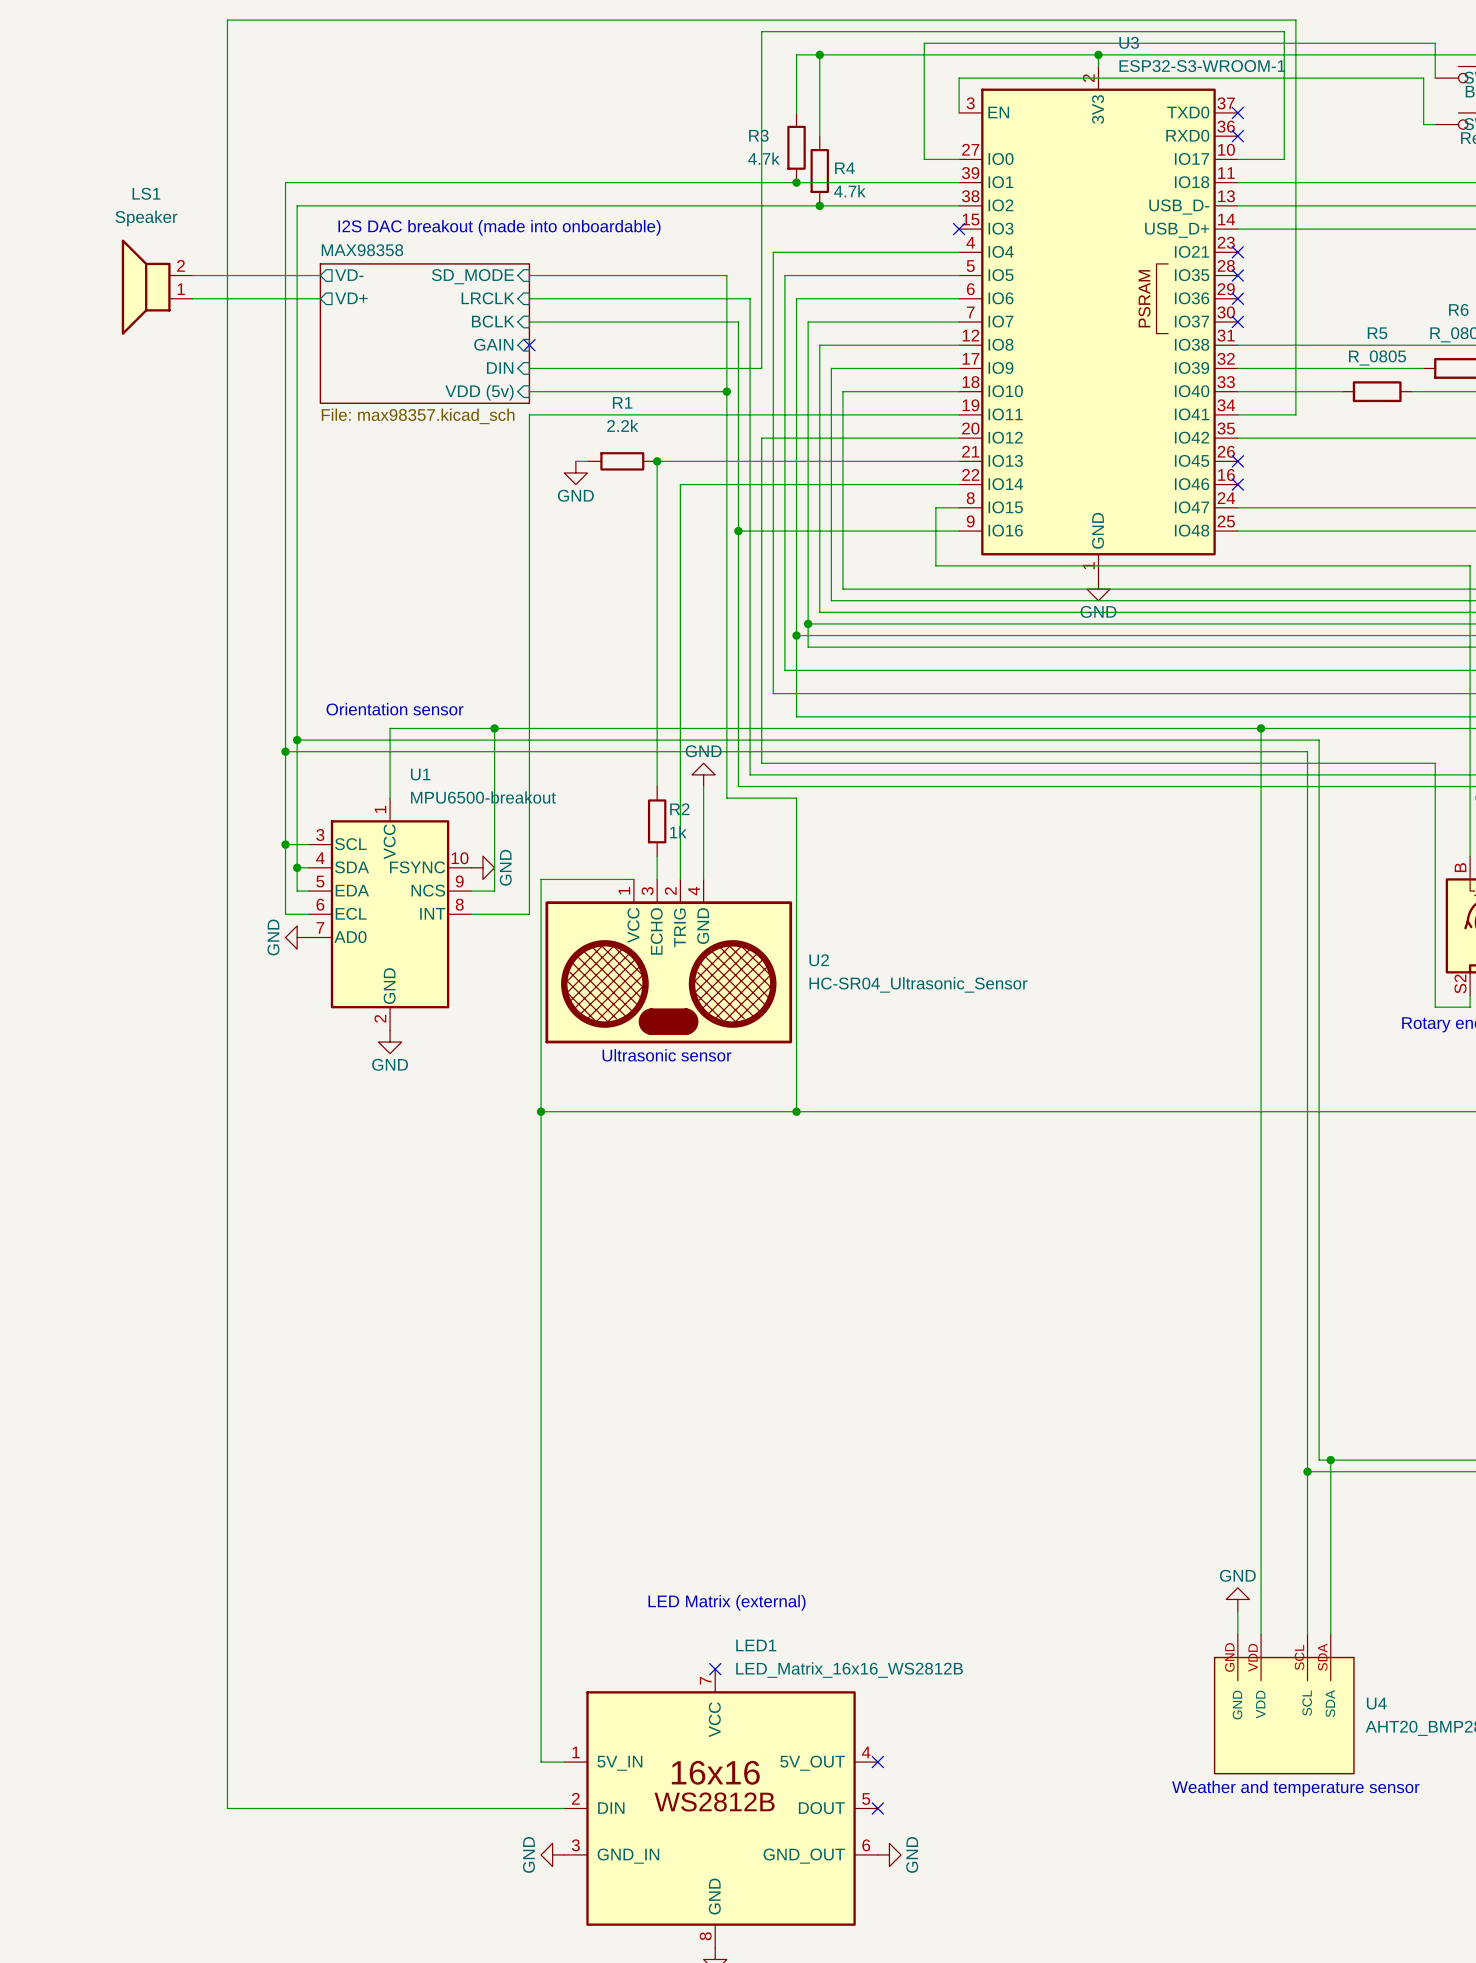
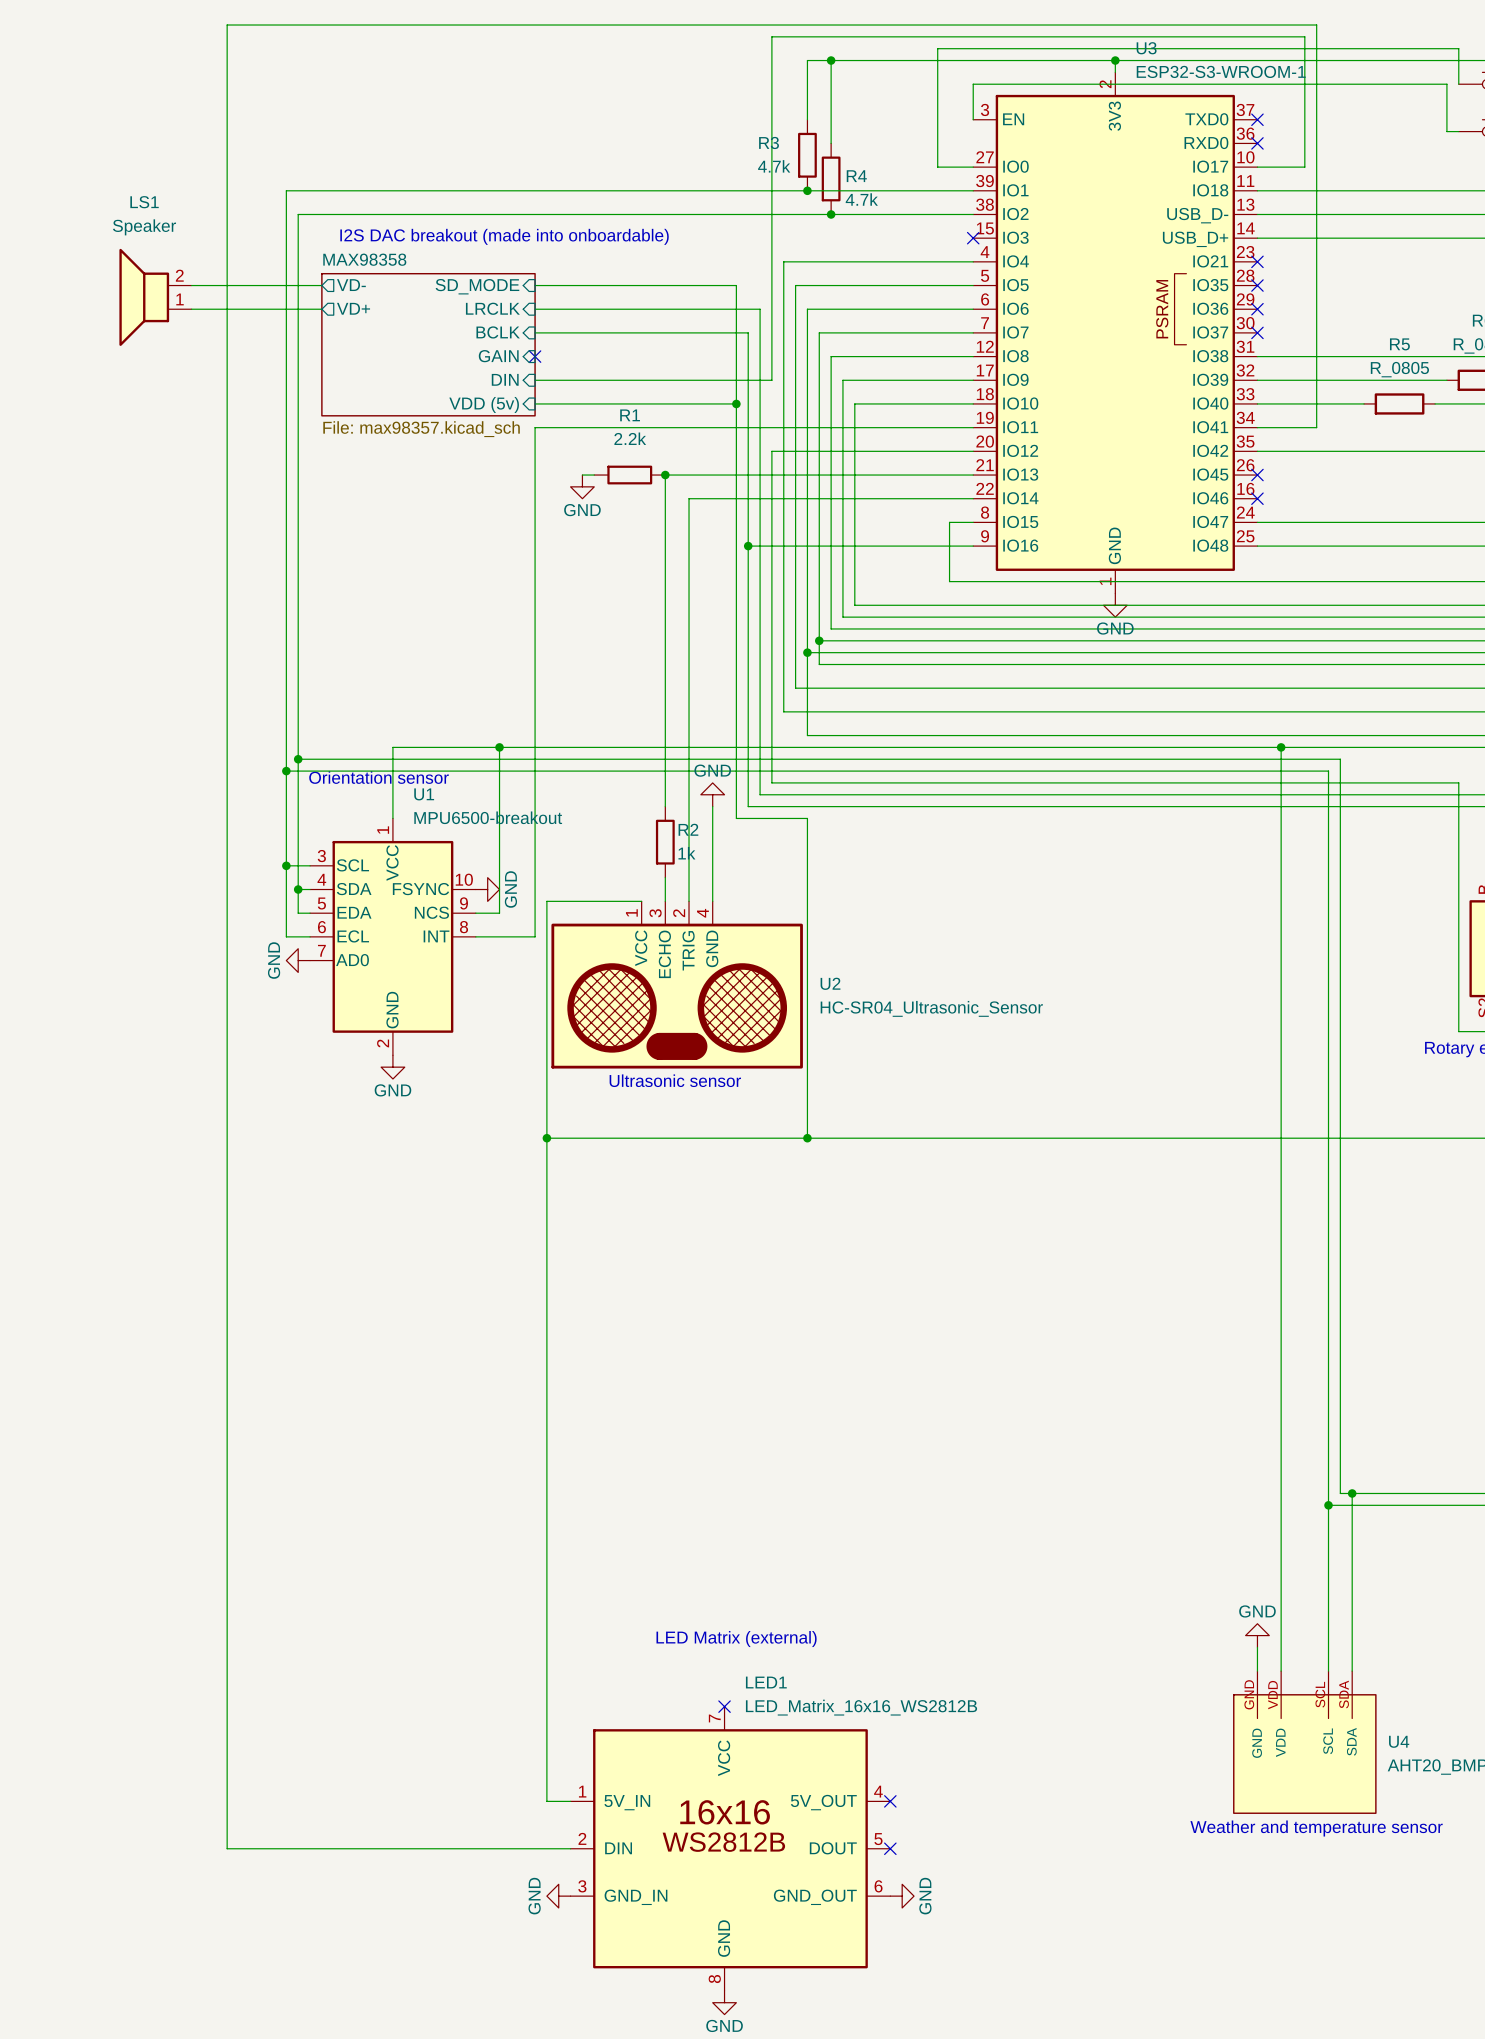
text position: Orientation sensor (394, 709) -> Orientation sensor (379, 777)

